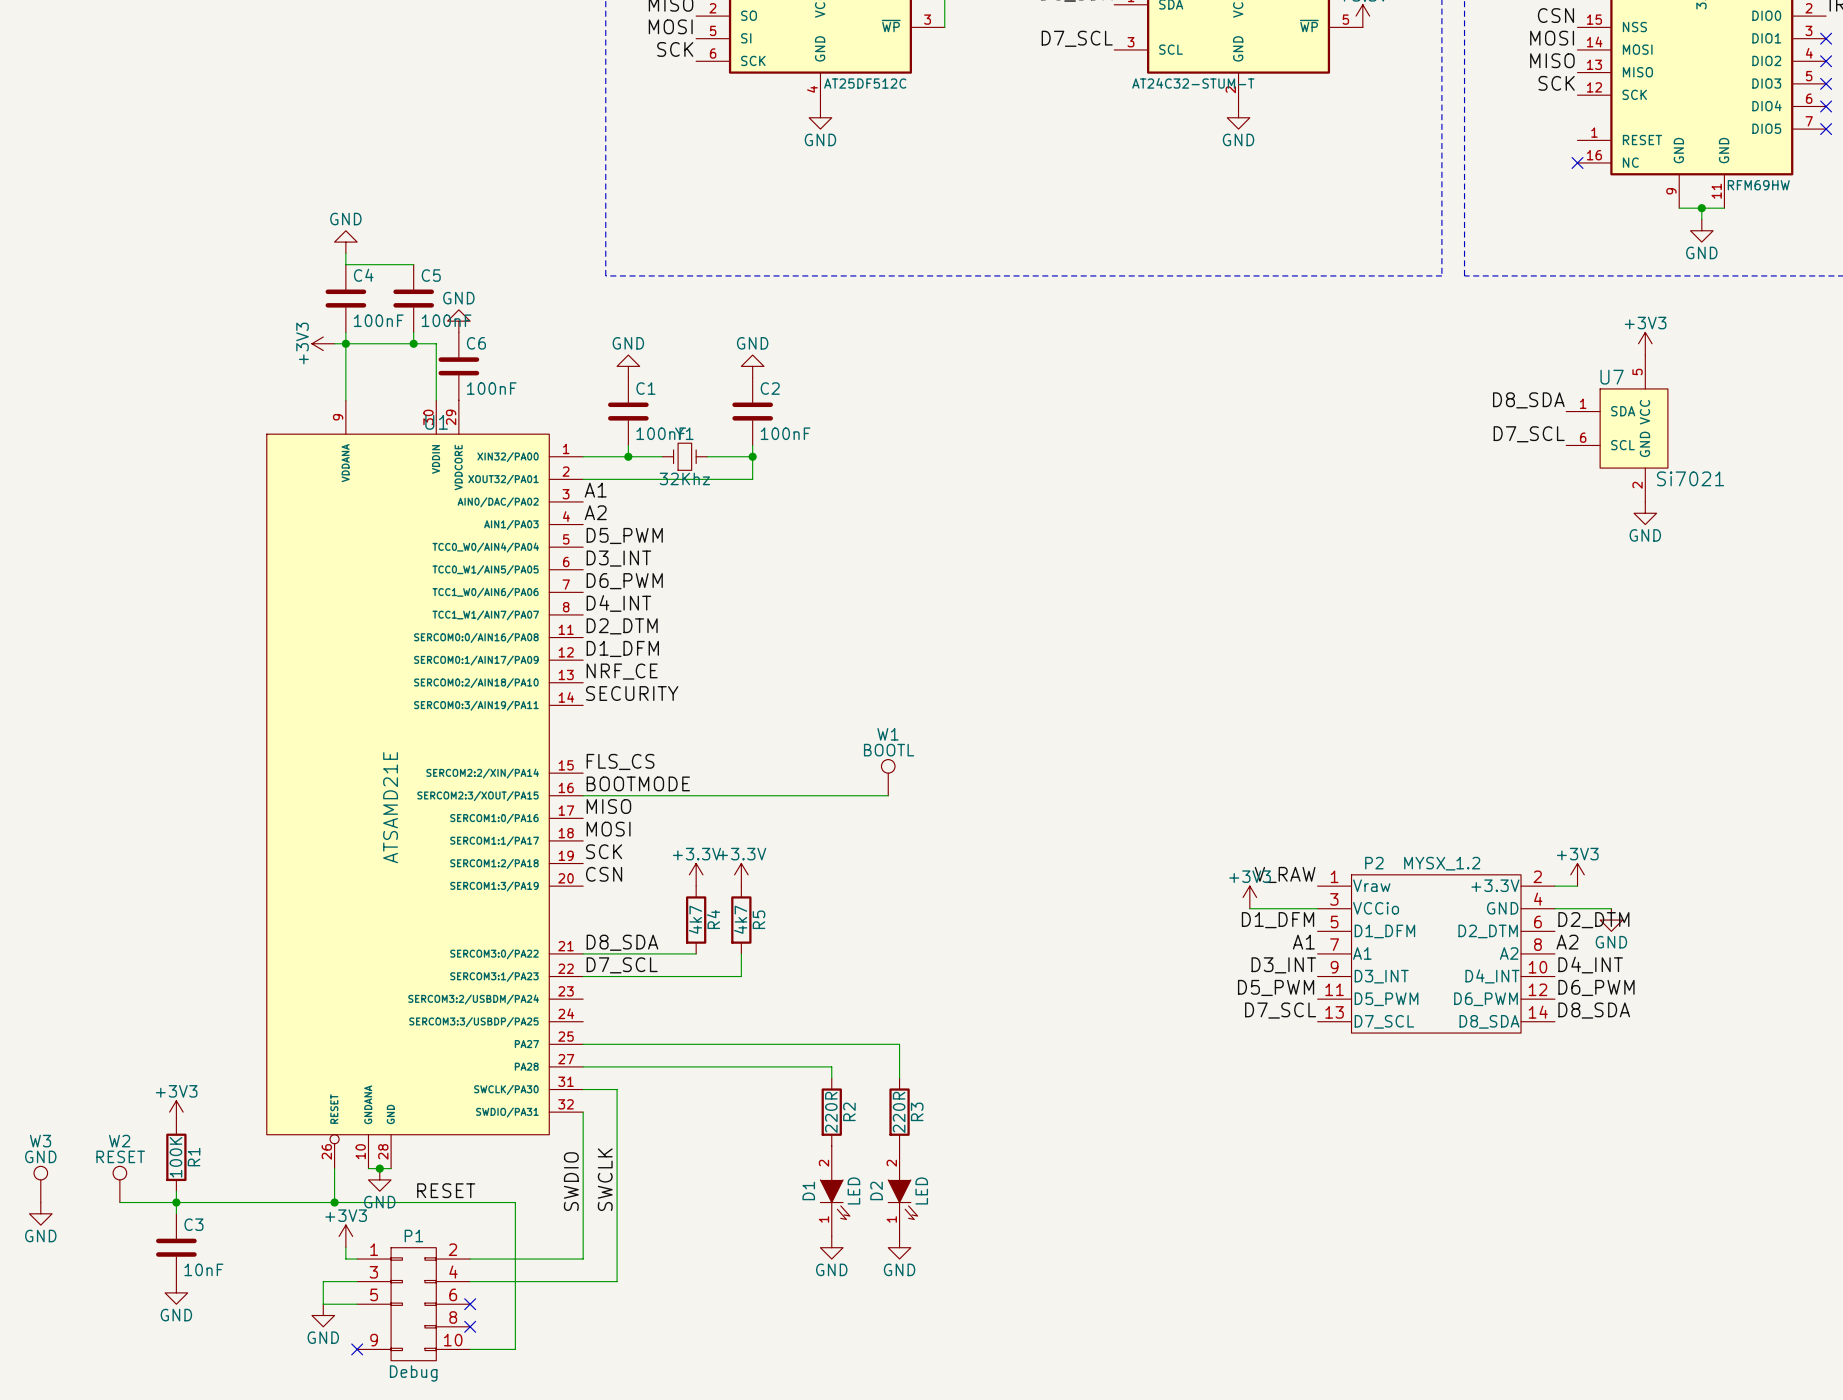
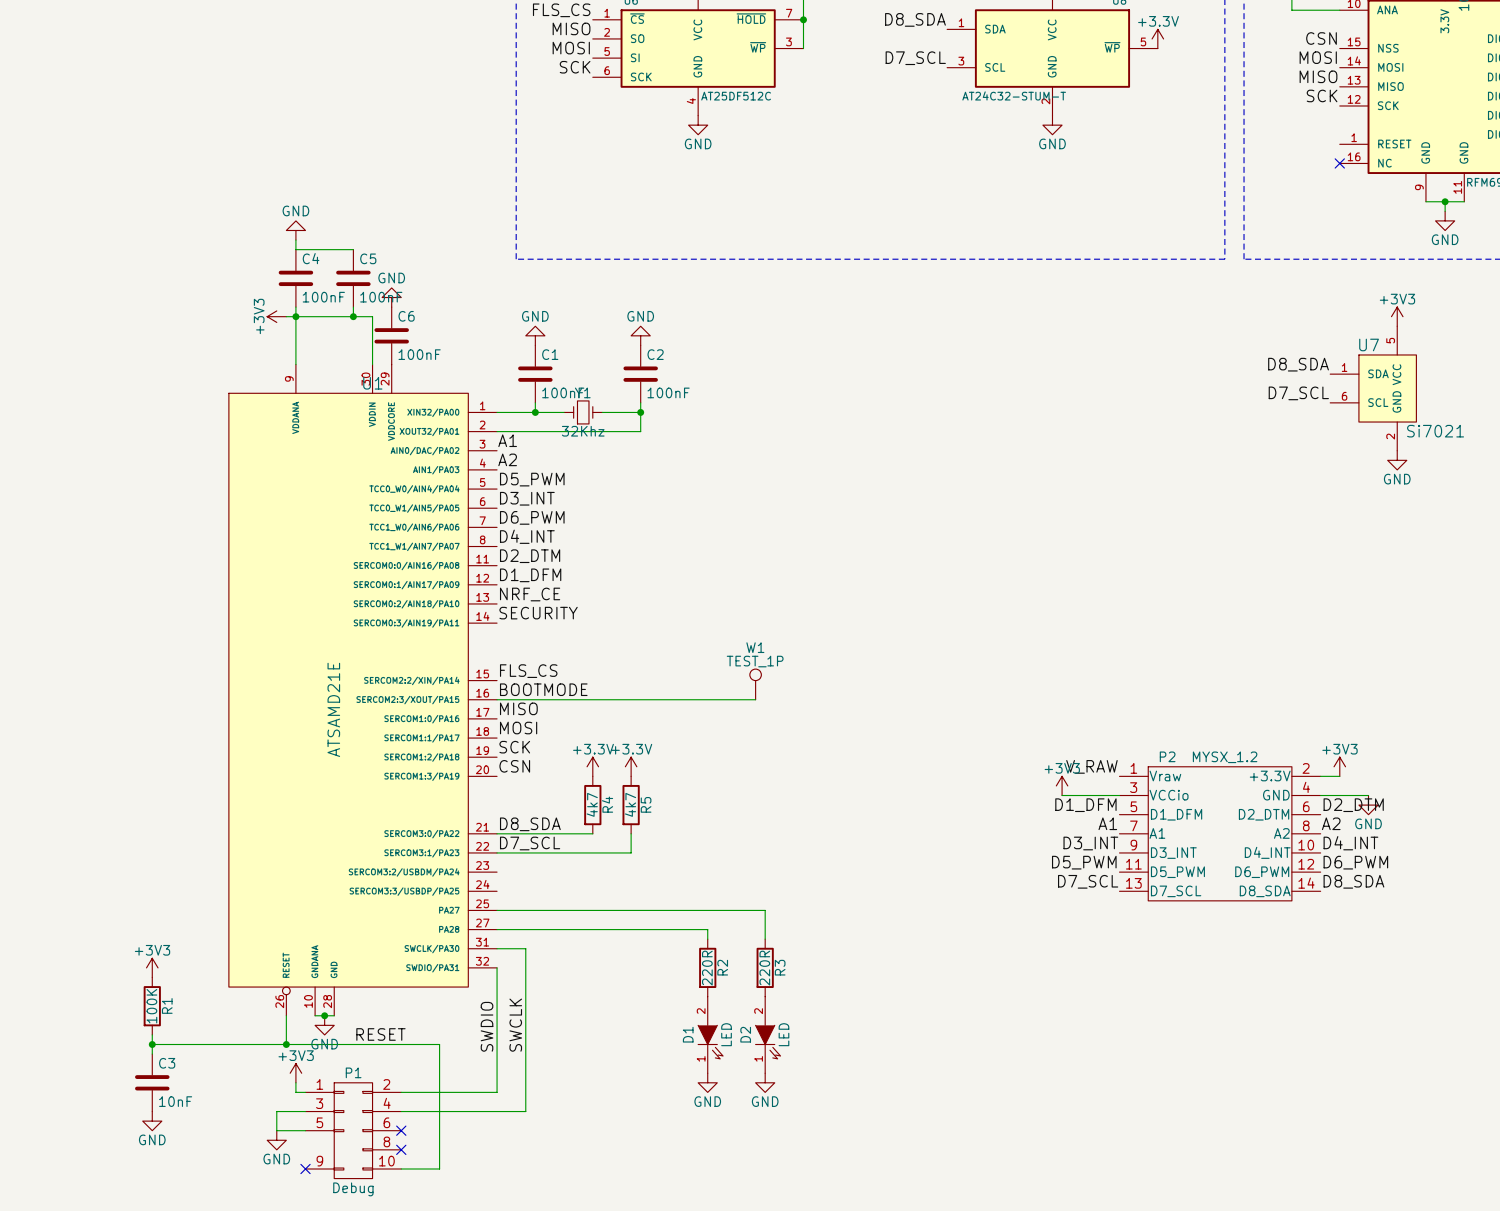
W1 value: BOOTL (889, 750) -> TEST_1P (755, 661)
W3: GND (40, 1184) -> none
W2: RESET (119, 1184) -> none
wire: (119, 1202) (176, 1202) -> none
power symbol: GND (40, 1213) -> none

